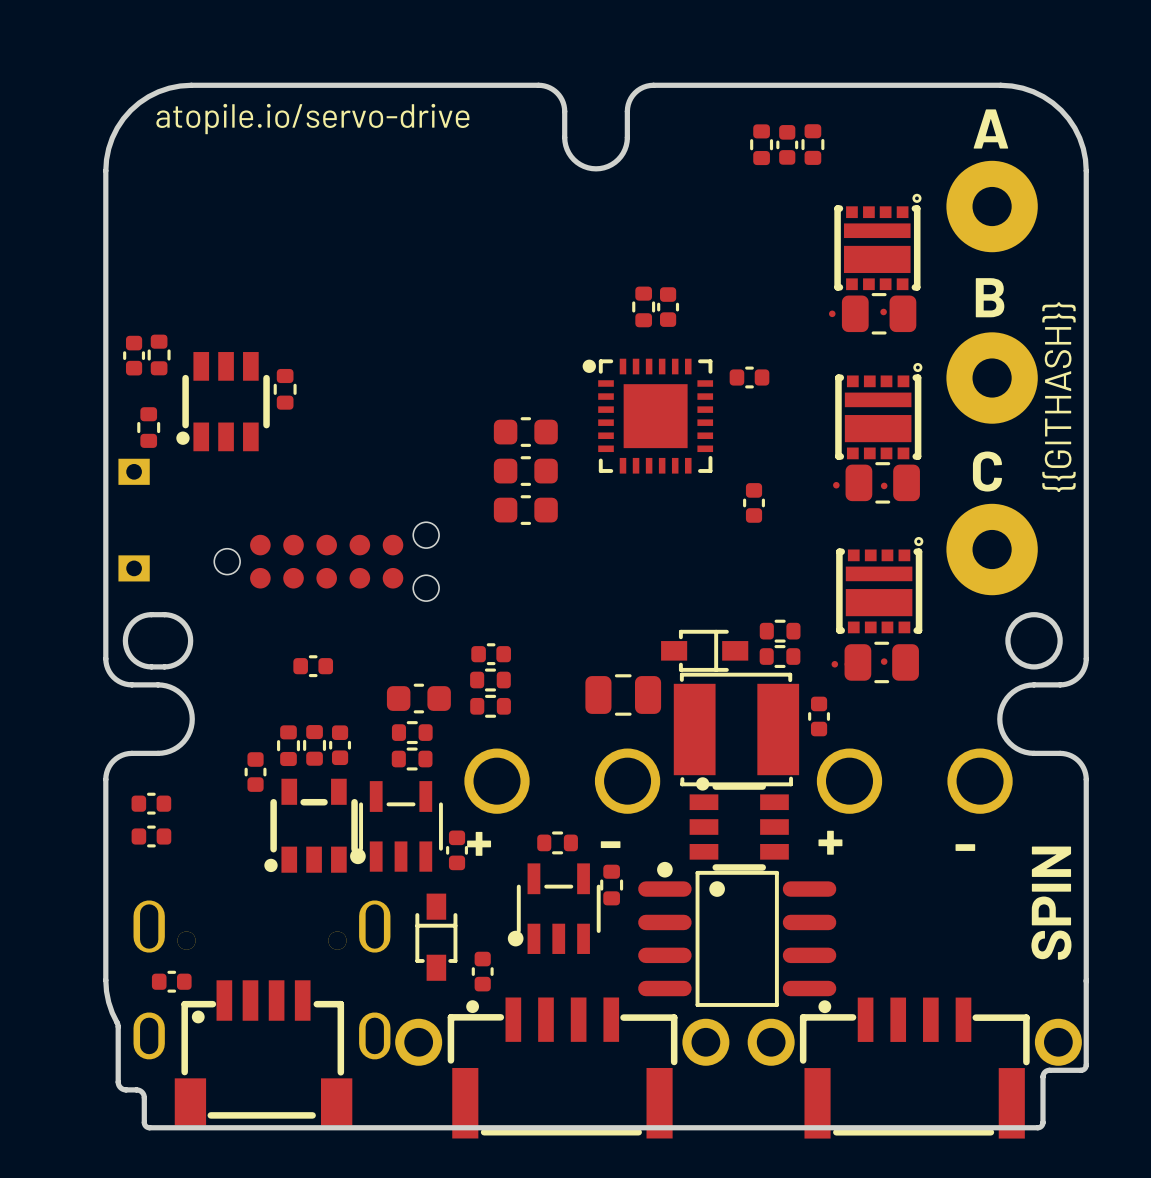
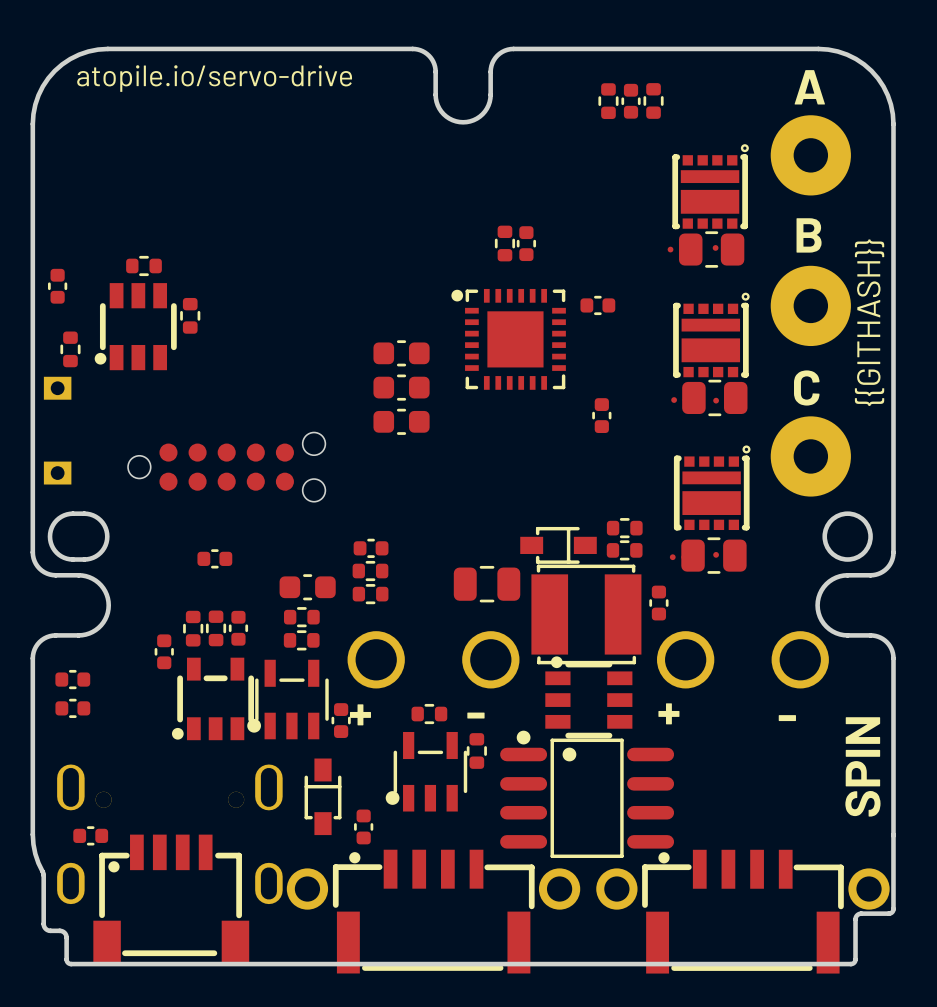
part rotation: 0° (159, 354) -> 90° clockwise (144, 265)
part position: (159, 354) -> (144, 265)

